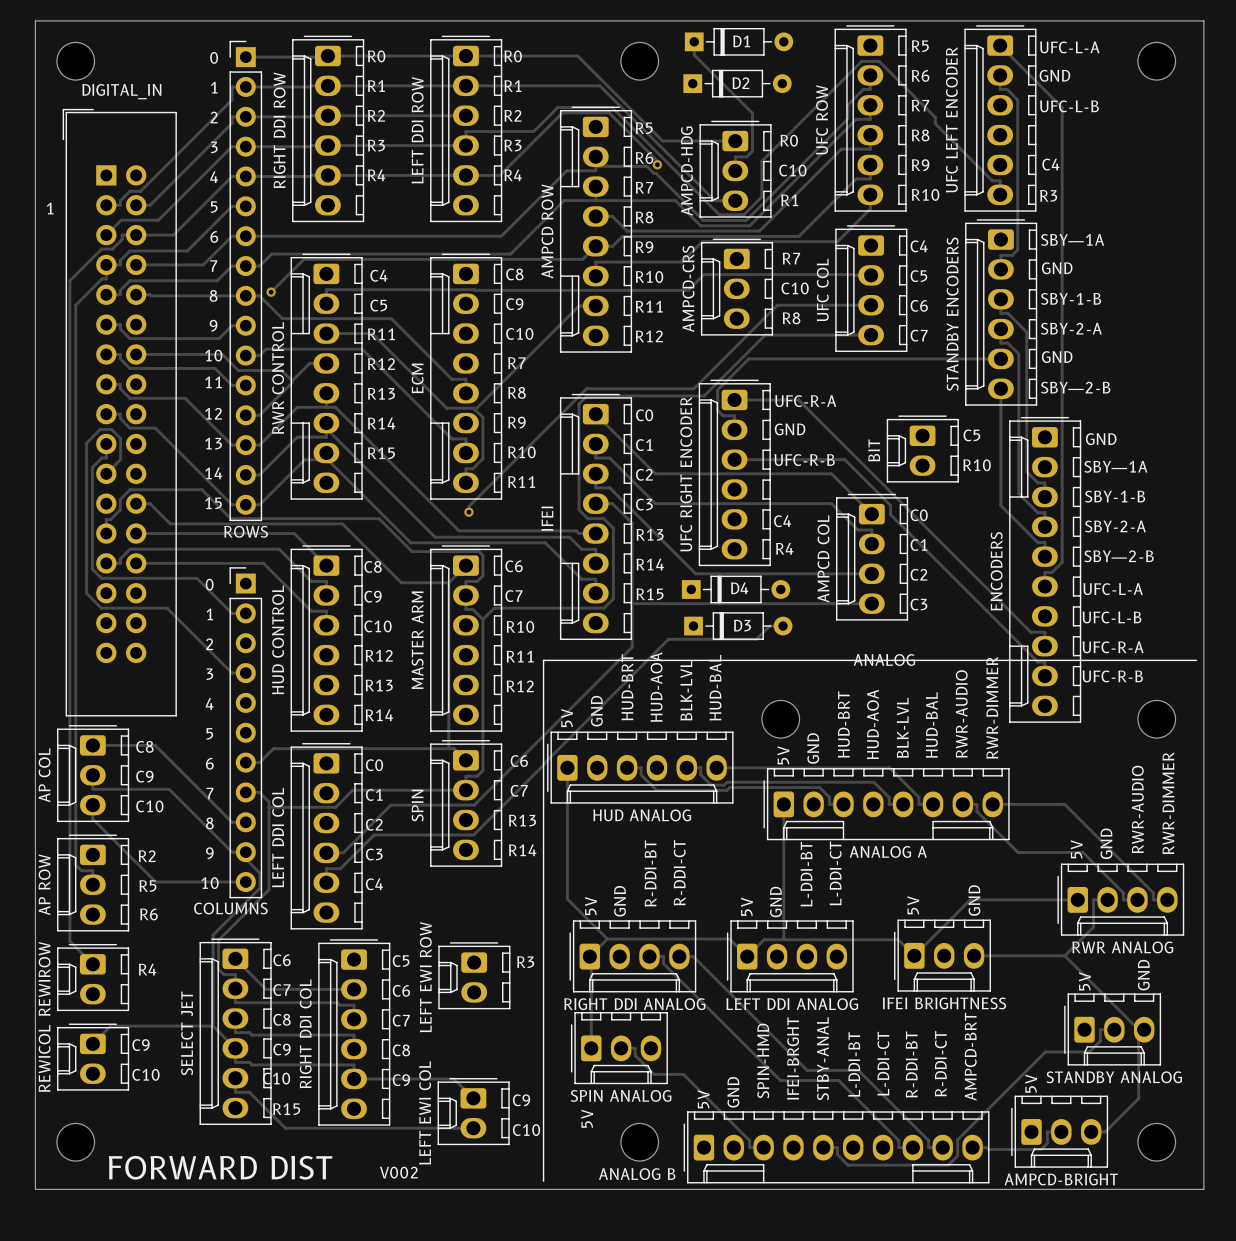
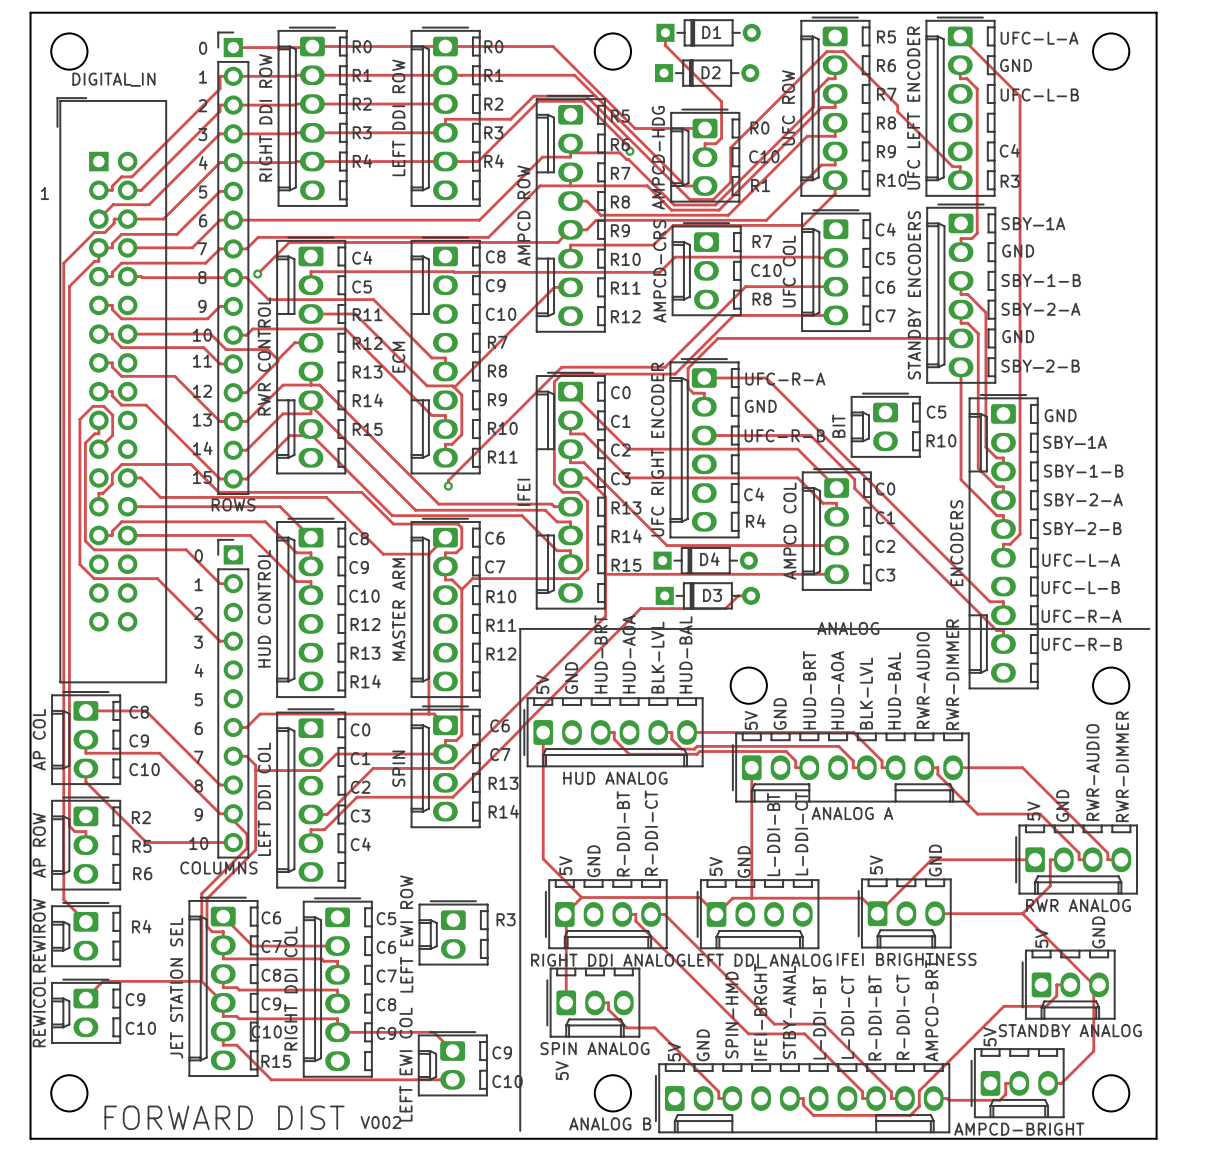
part value: SELECT JET (187, 1033) -> JET STATION SEL (176, 988)

